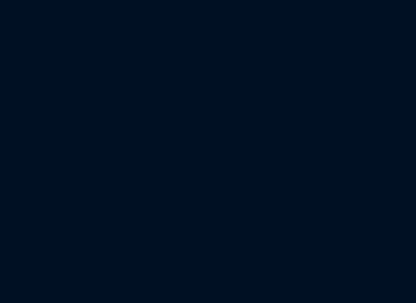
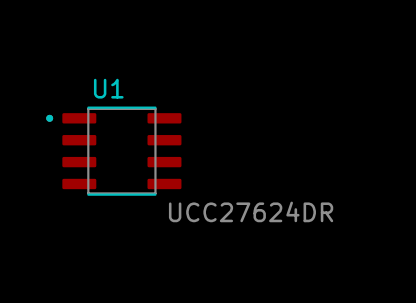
U1: none -> UCC27624DR (113, 151)

